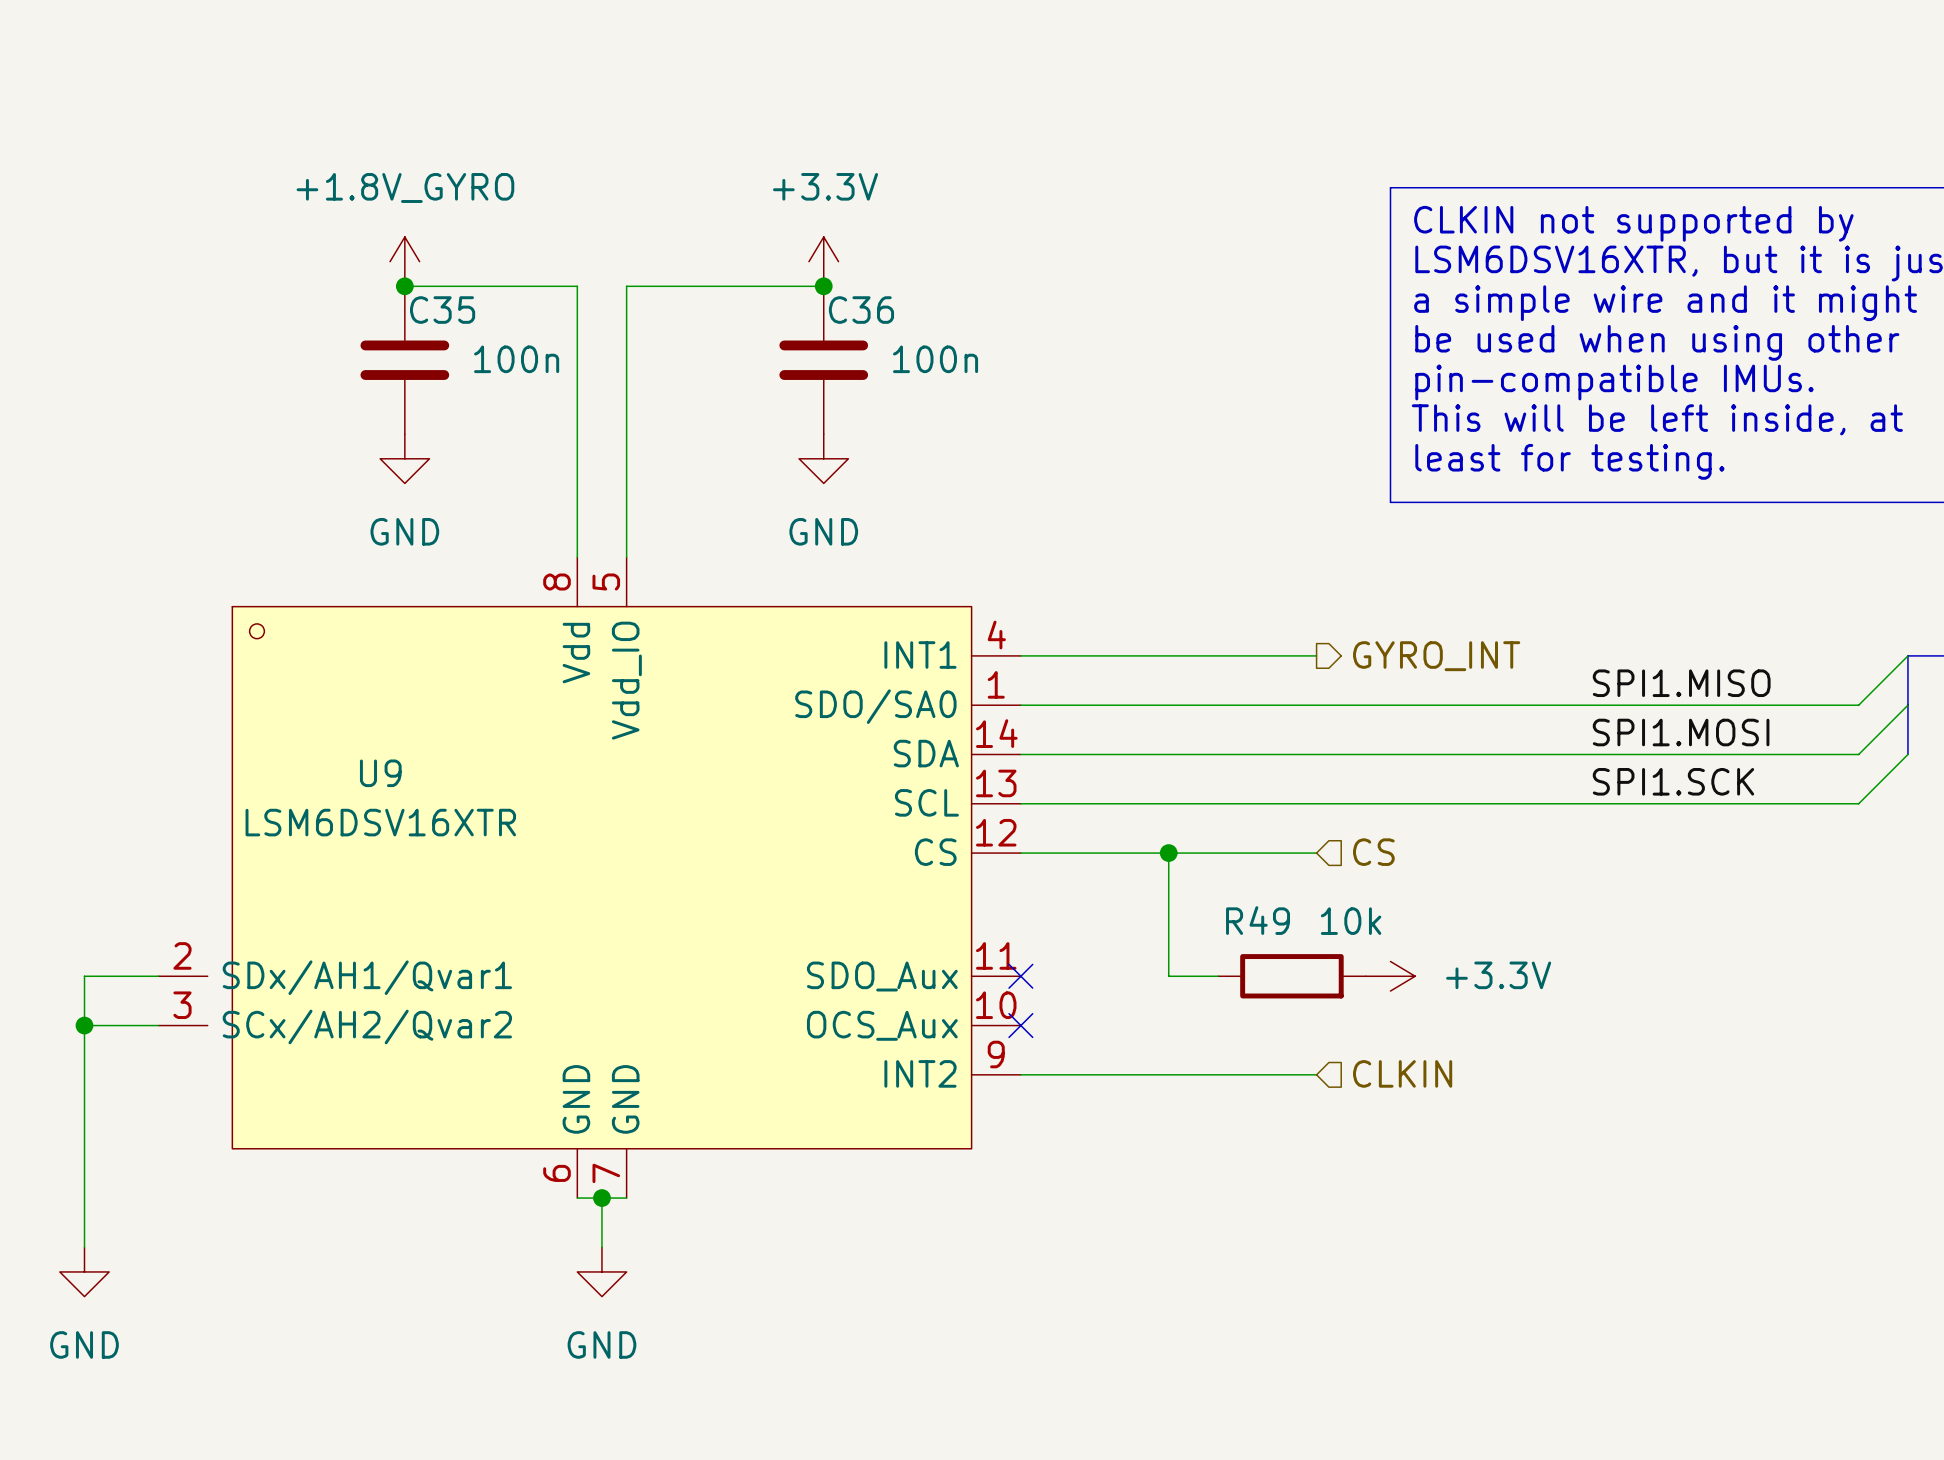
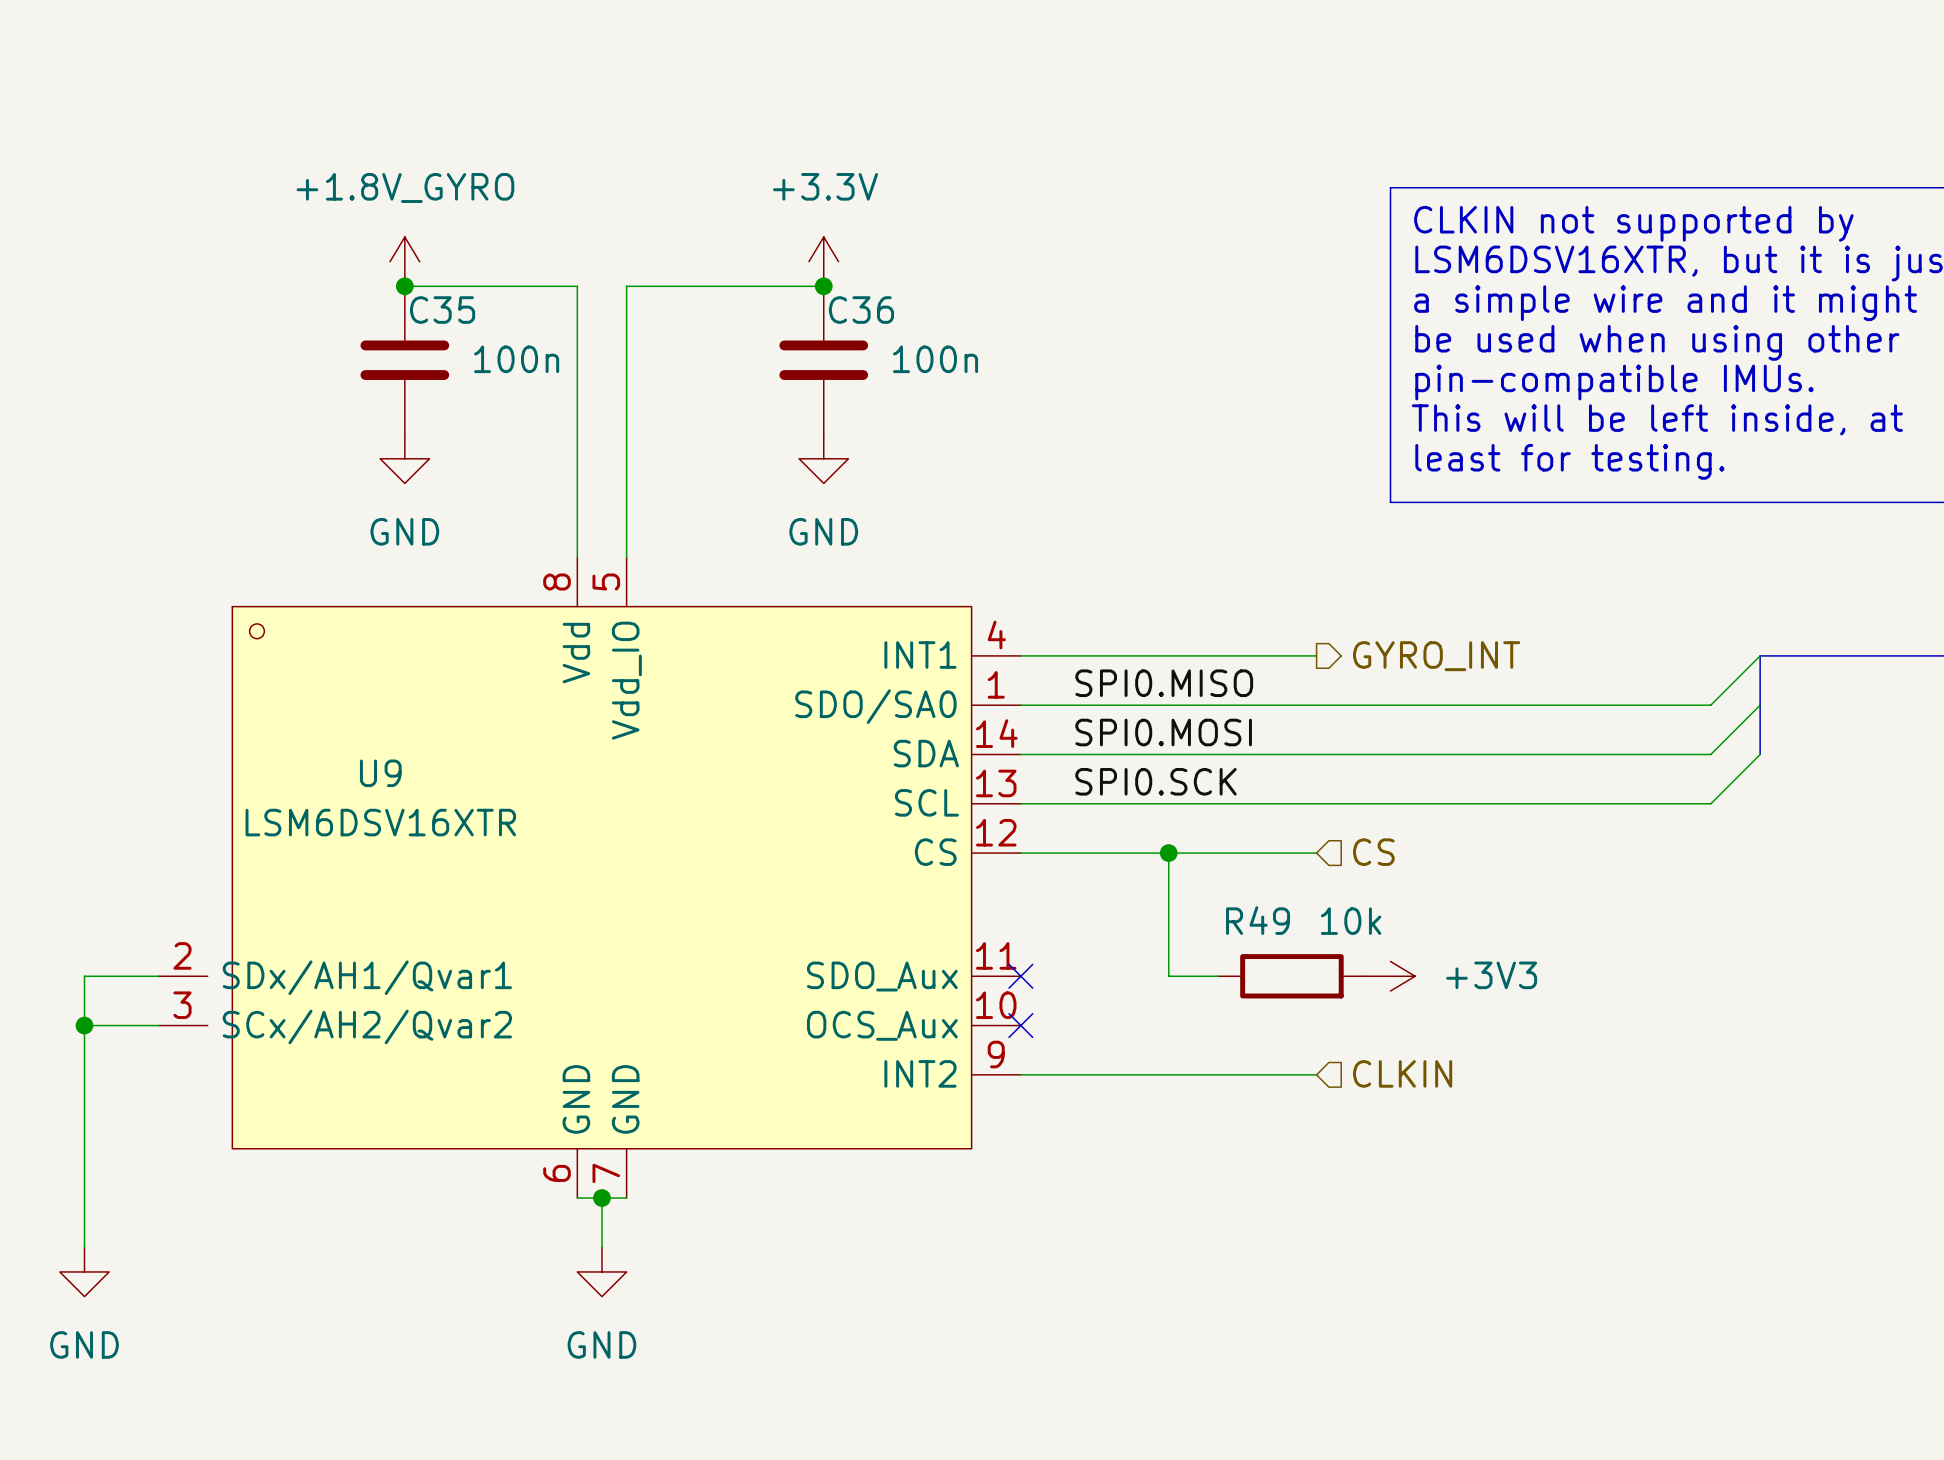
wire: (1907, 655) (1858, 705) (1710, 705) -> (1760, 655) (1710, 705)
bus: (1907, 655) (1907, 754) -> (1907, 655) (1760, 655) (1760, 754)
label: none -> SPI0.MISO (1164, 683)
label: SPI1.MISO (1681, 683) -> none
wire: (1907, 705) (1858, 754) (1710, 754) -> (1760, 705) (1710, 754)
label: none -> SPI0.MOSI (1163, 732)
label: SPI1.MOSI (1681, 732) -> none
wire: (1907, 754) (1858, 803) (1710, 803) -> (1760, 754) (1710, 803)
label: none -> SPI0.SCK (1156, 781)
label: SPI1.SCK (1673, 781) -> none
power symbol: +3.3V (1390, 976) -> +3V3 (1390, 976)

